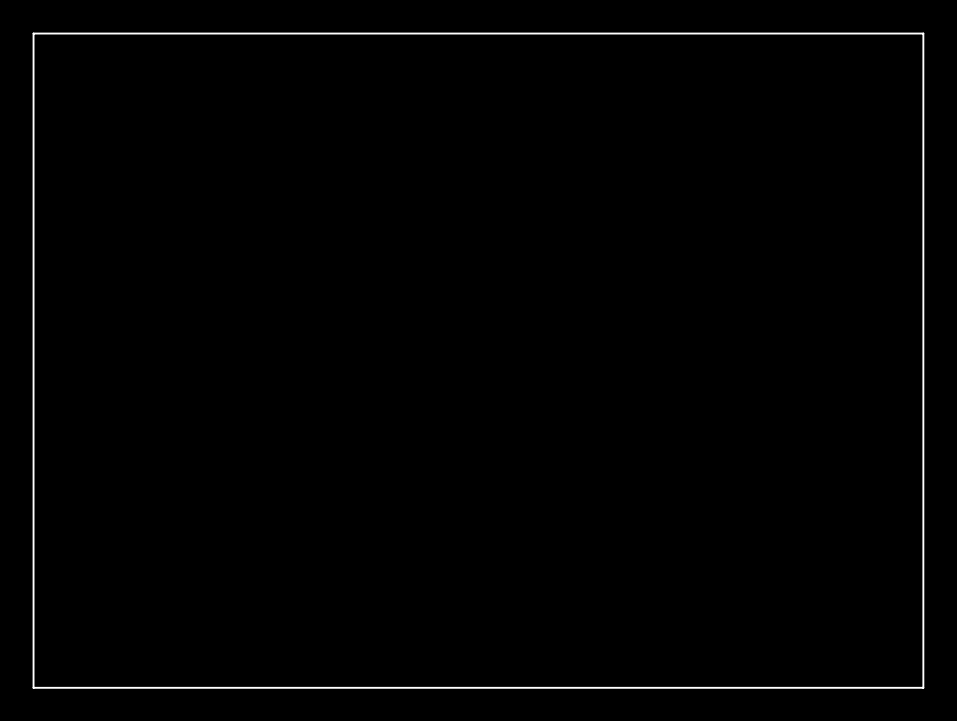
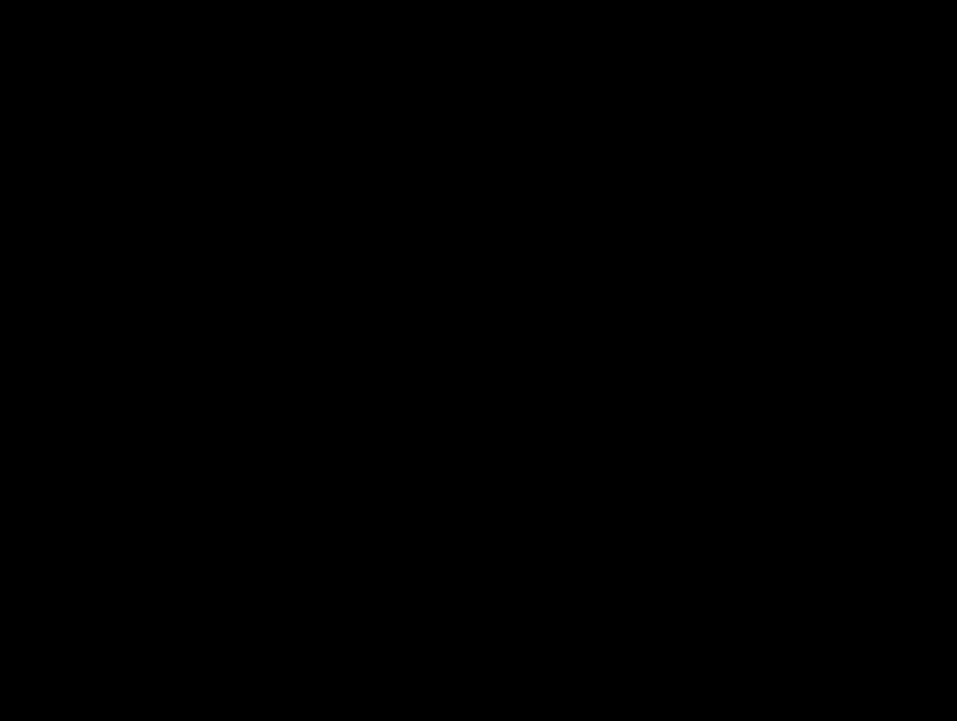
board edge: (33, 33) (923, 33) (923, 687) (33, 687) (33, 33) -> none

